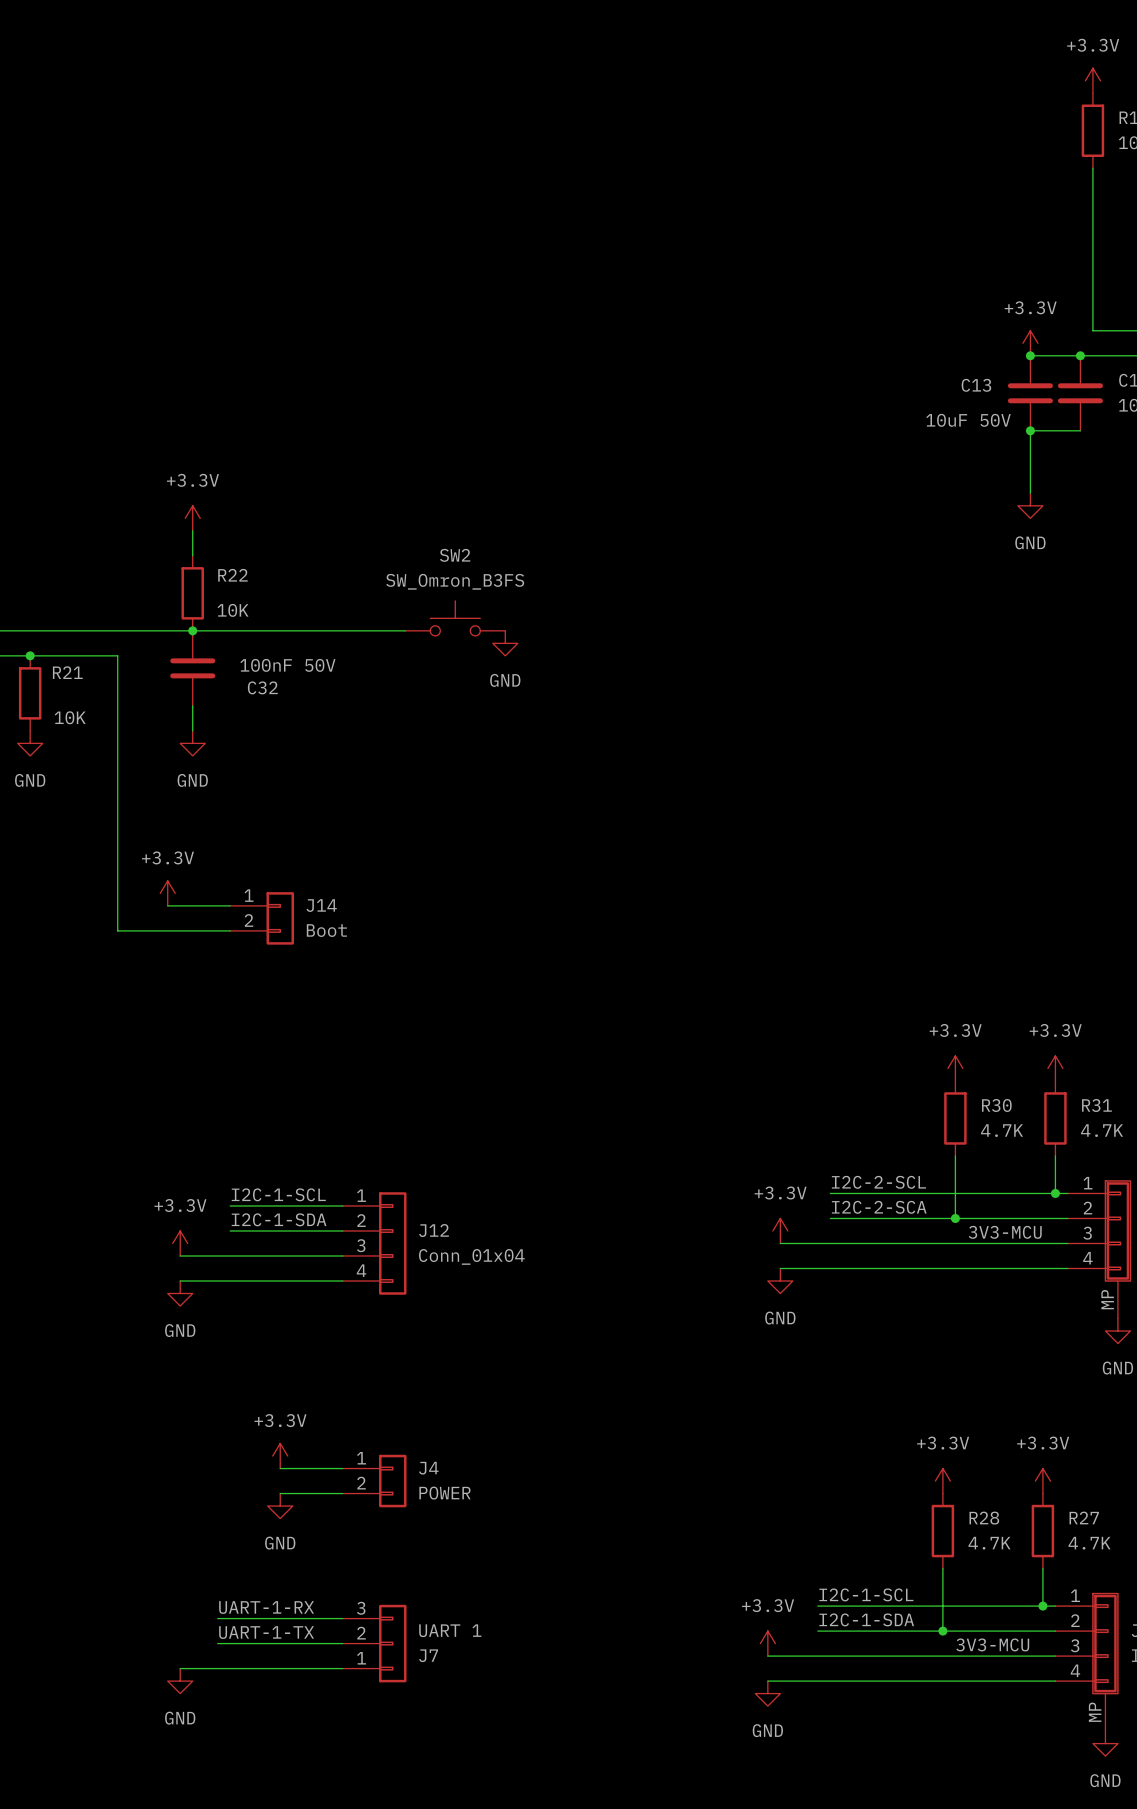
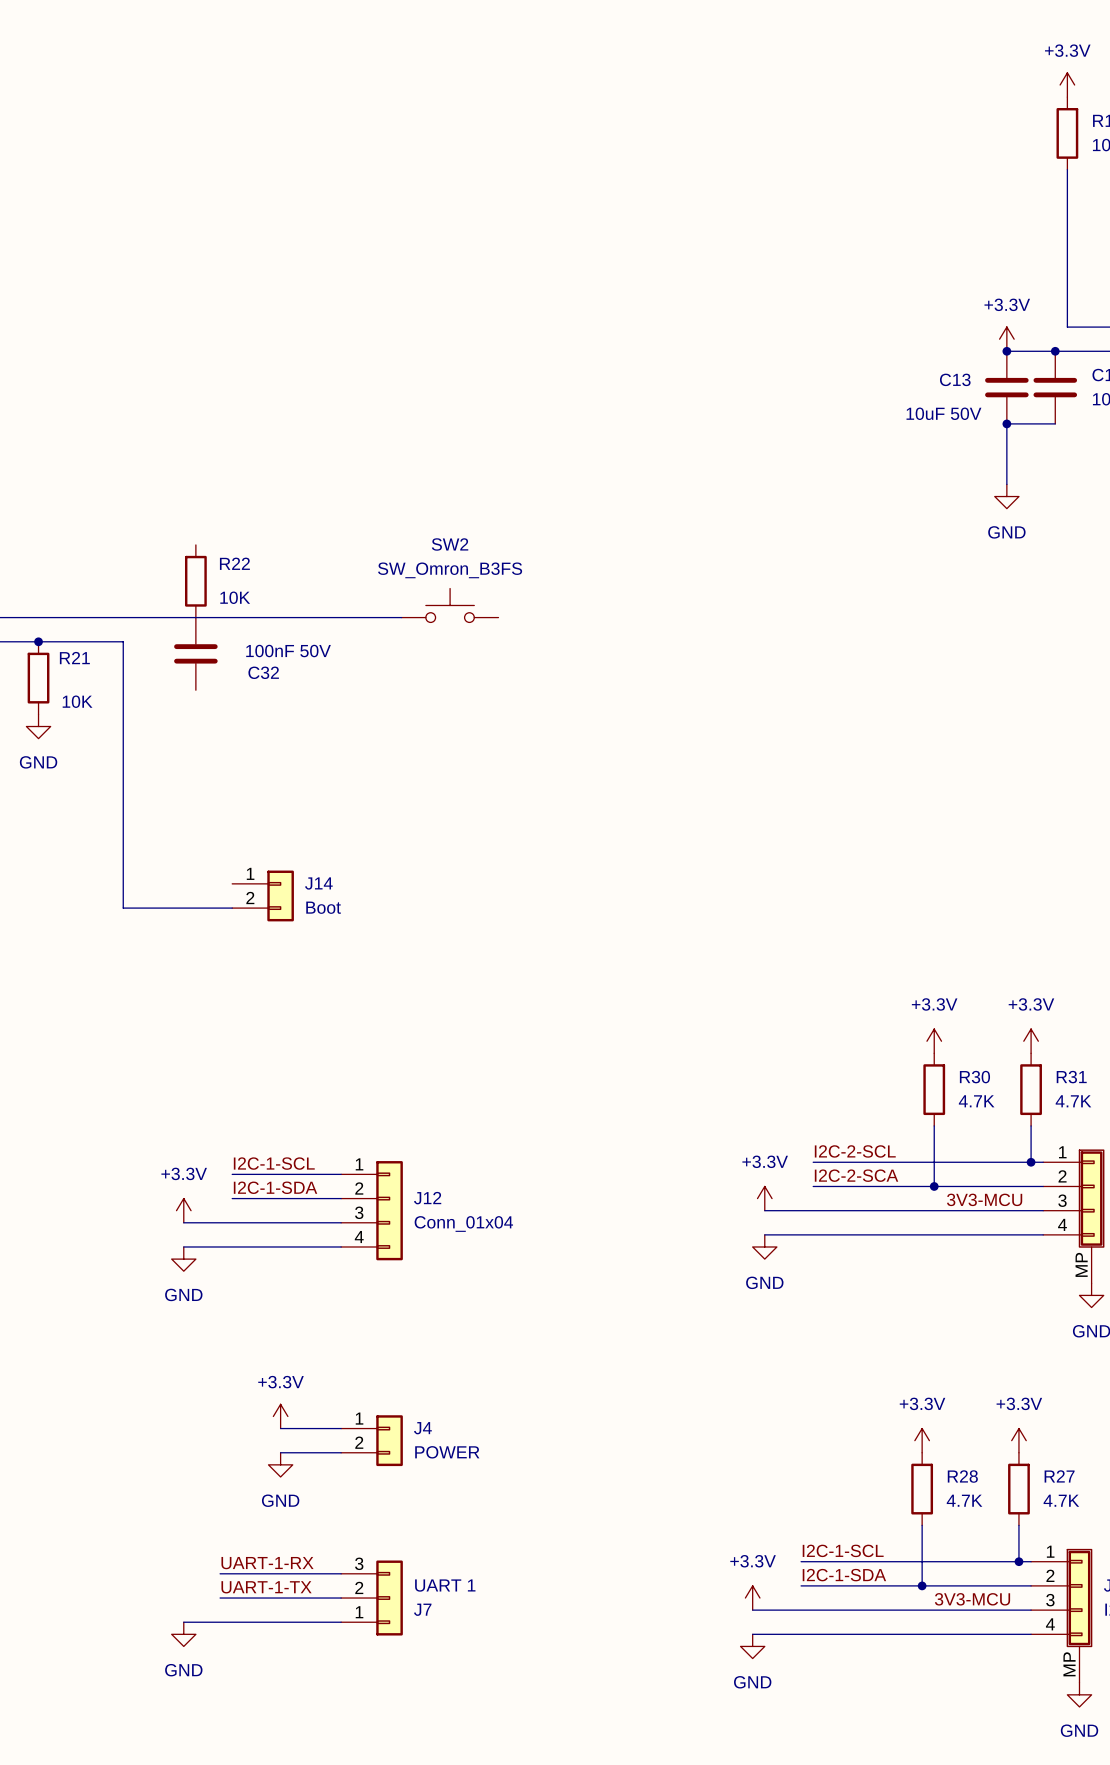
power symbol: +3.3V (192, 518) -> none
wire: (192, 530) (192, 555) -> none
junction: (192, 630) -> none
power symbol: GND (505, 643) -> none
wire: (192, 705) (192, 730) -> none
power symbol: GND (192, 743) -> none
power symbol: +3.3V (167, 893) -> none
wire: (167, 905) (230, 905) -> none

